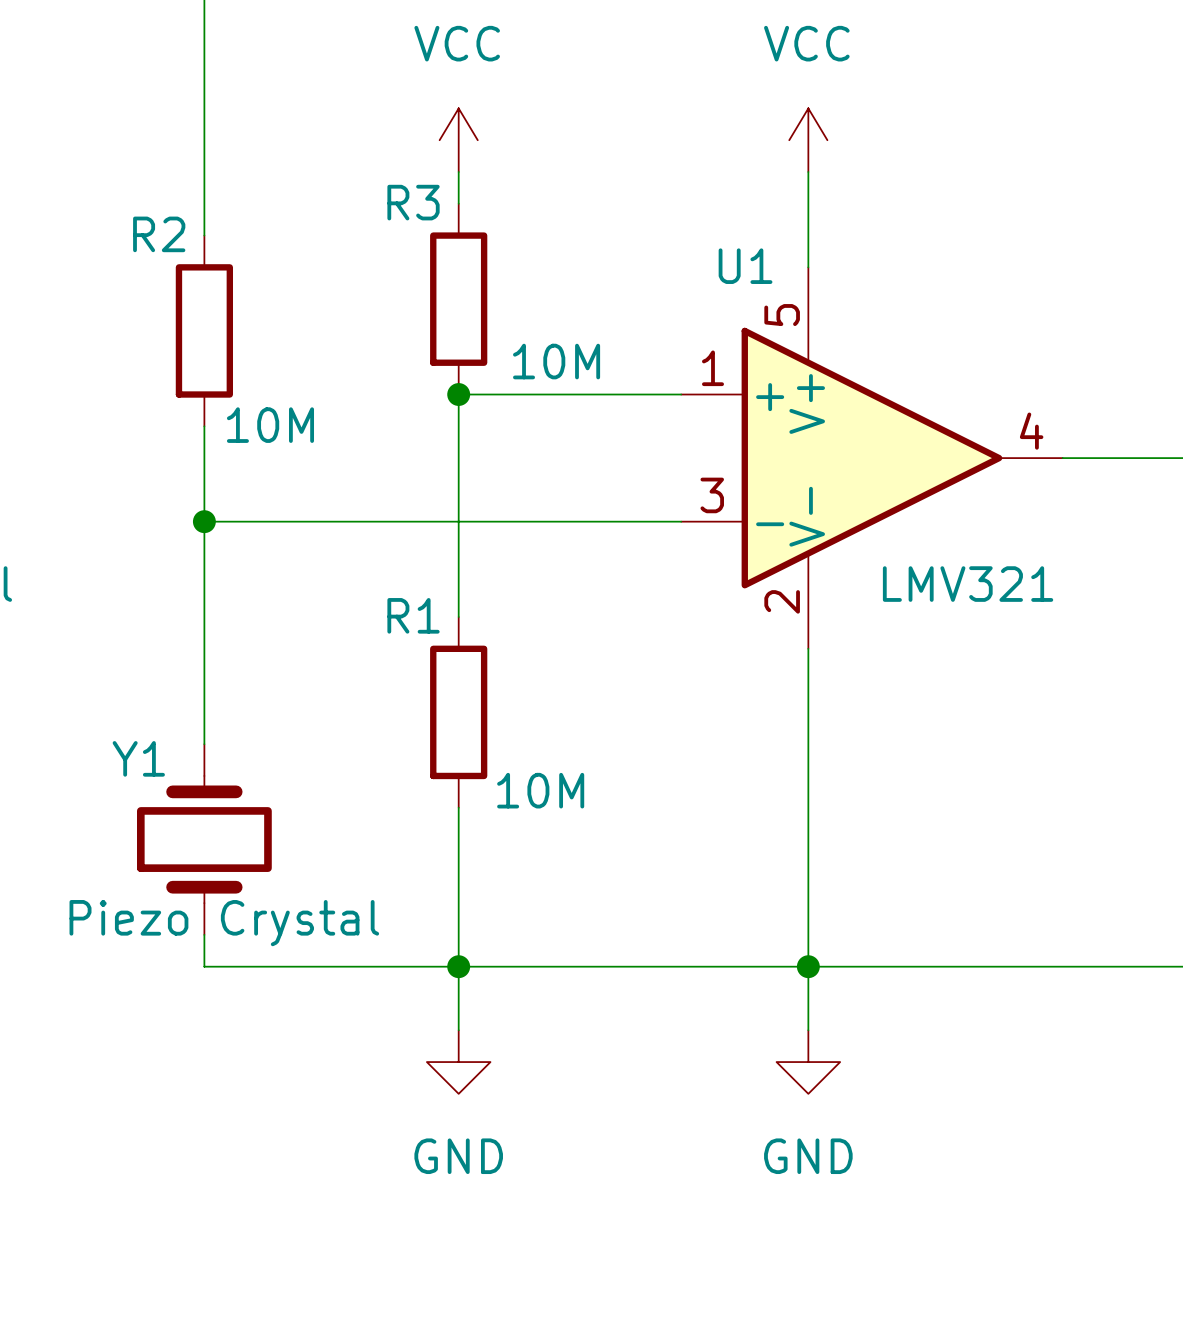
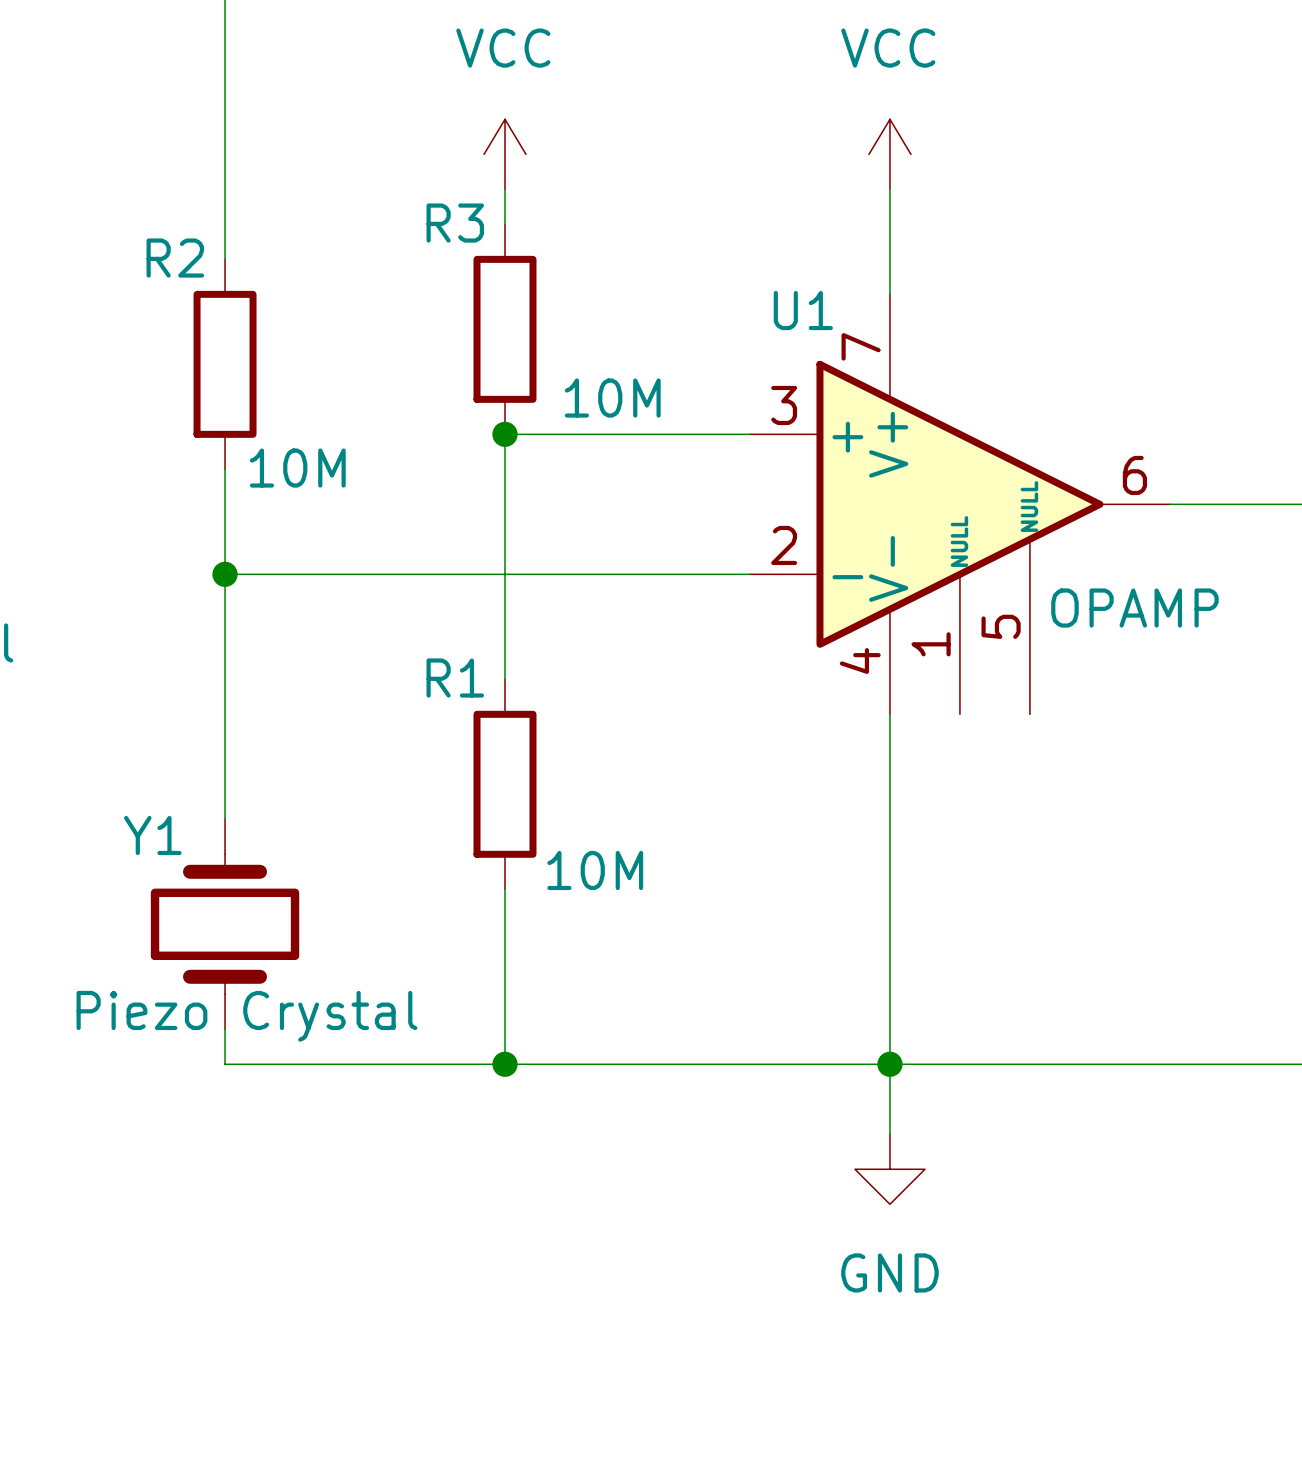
U1 symbol: [681, 267, 1063, 649] -> [749, 294, 1170, 715]
U1 value: LMV321 (968, 584) -> OPAMP (1134, 608)
wire: (458, 966) (458, 1030) -> none
power symbol: GND (458, 1062) -> none

